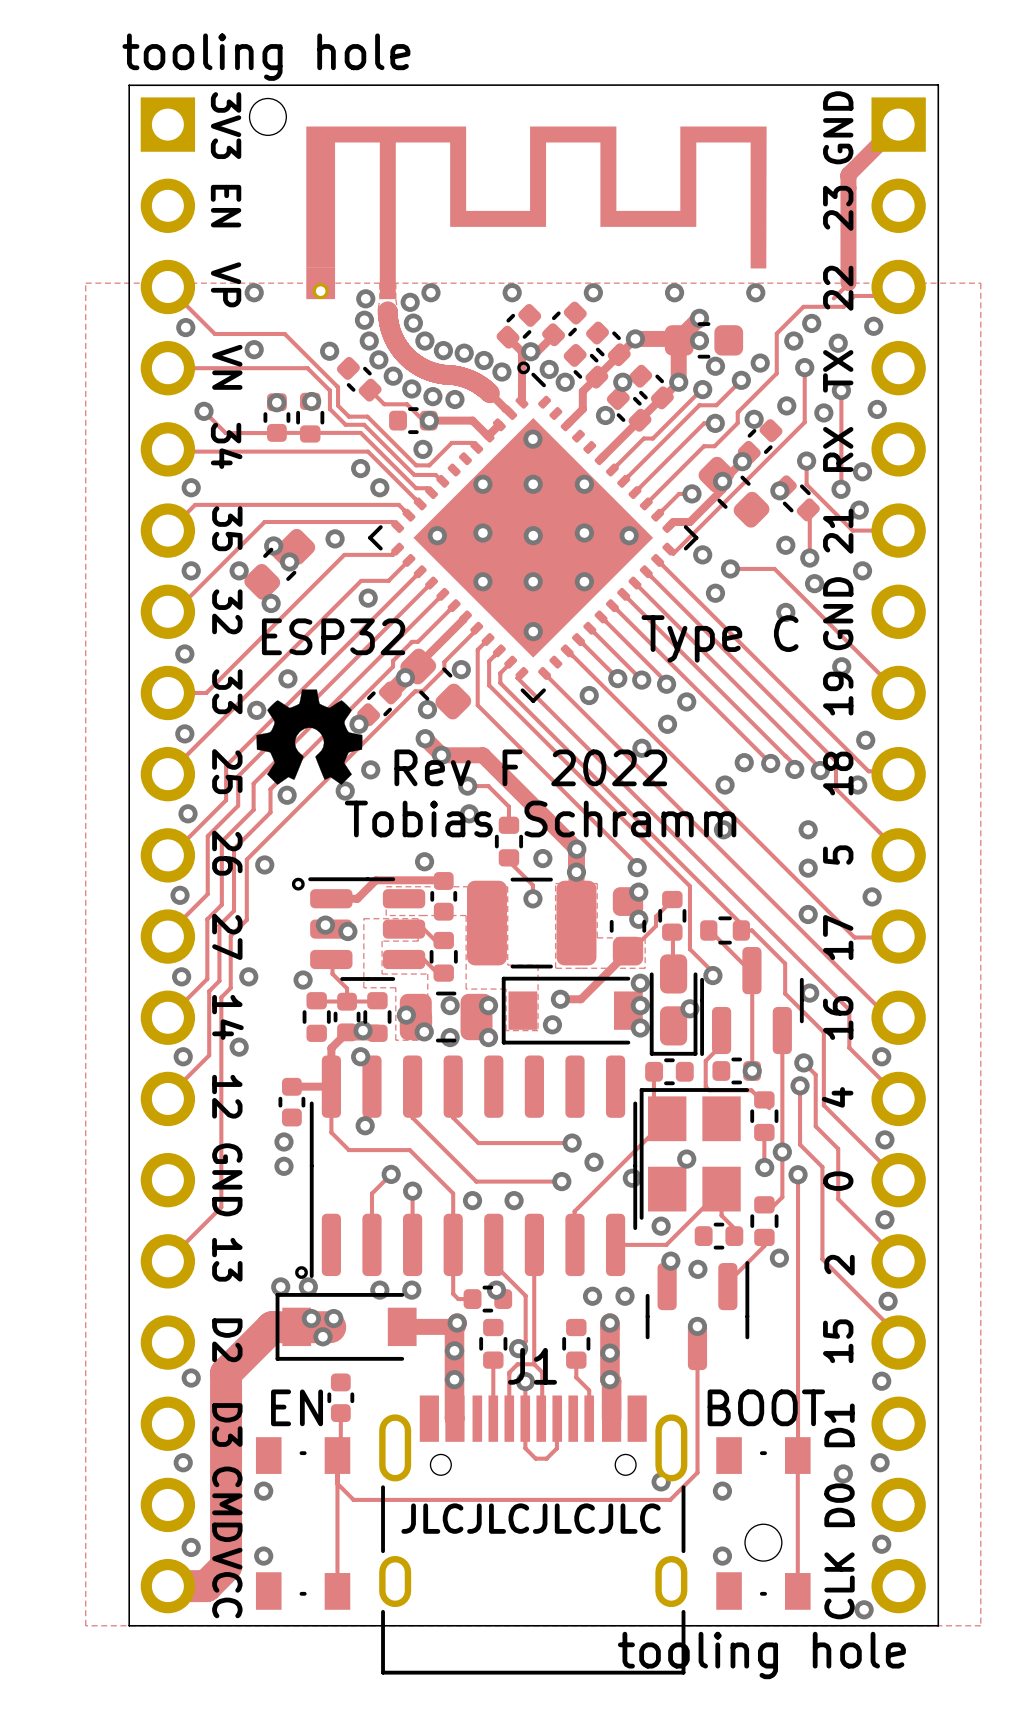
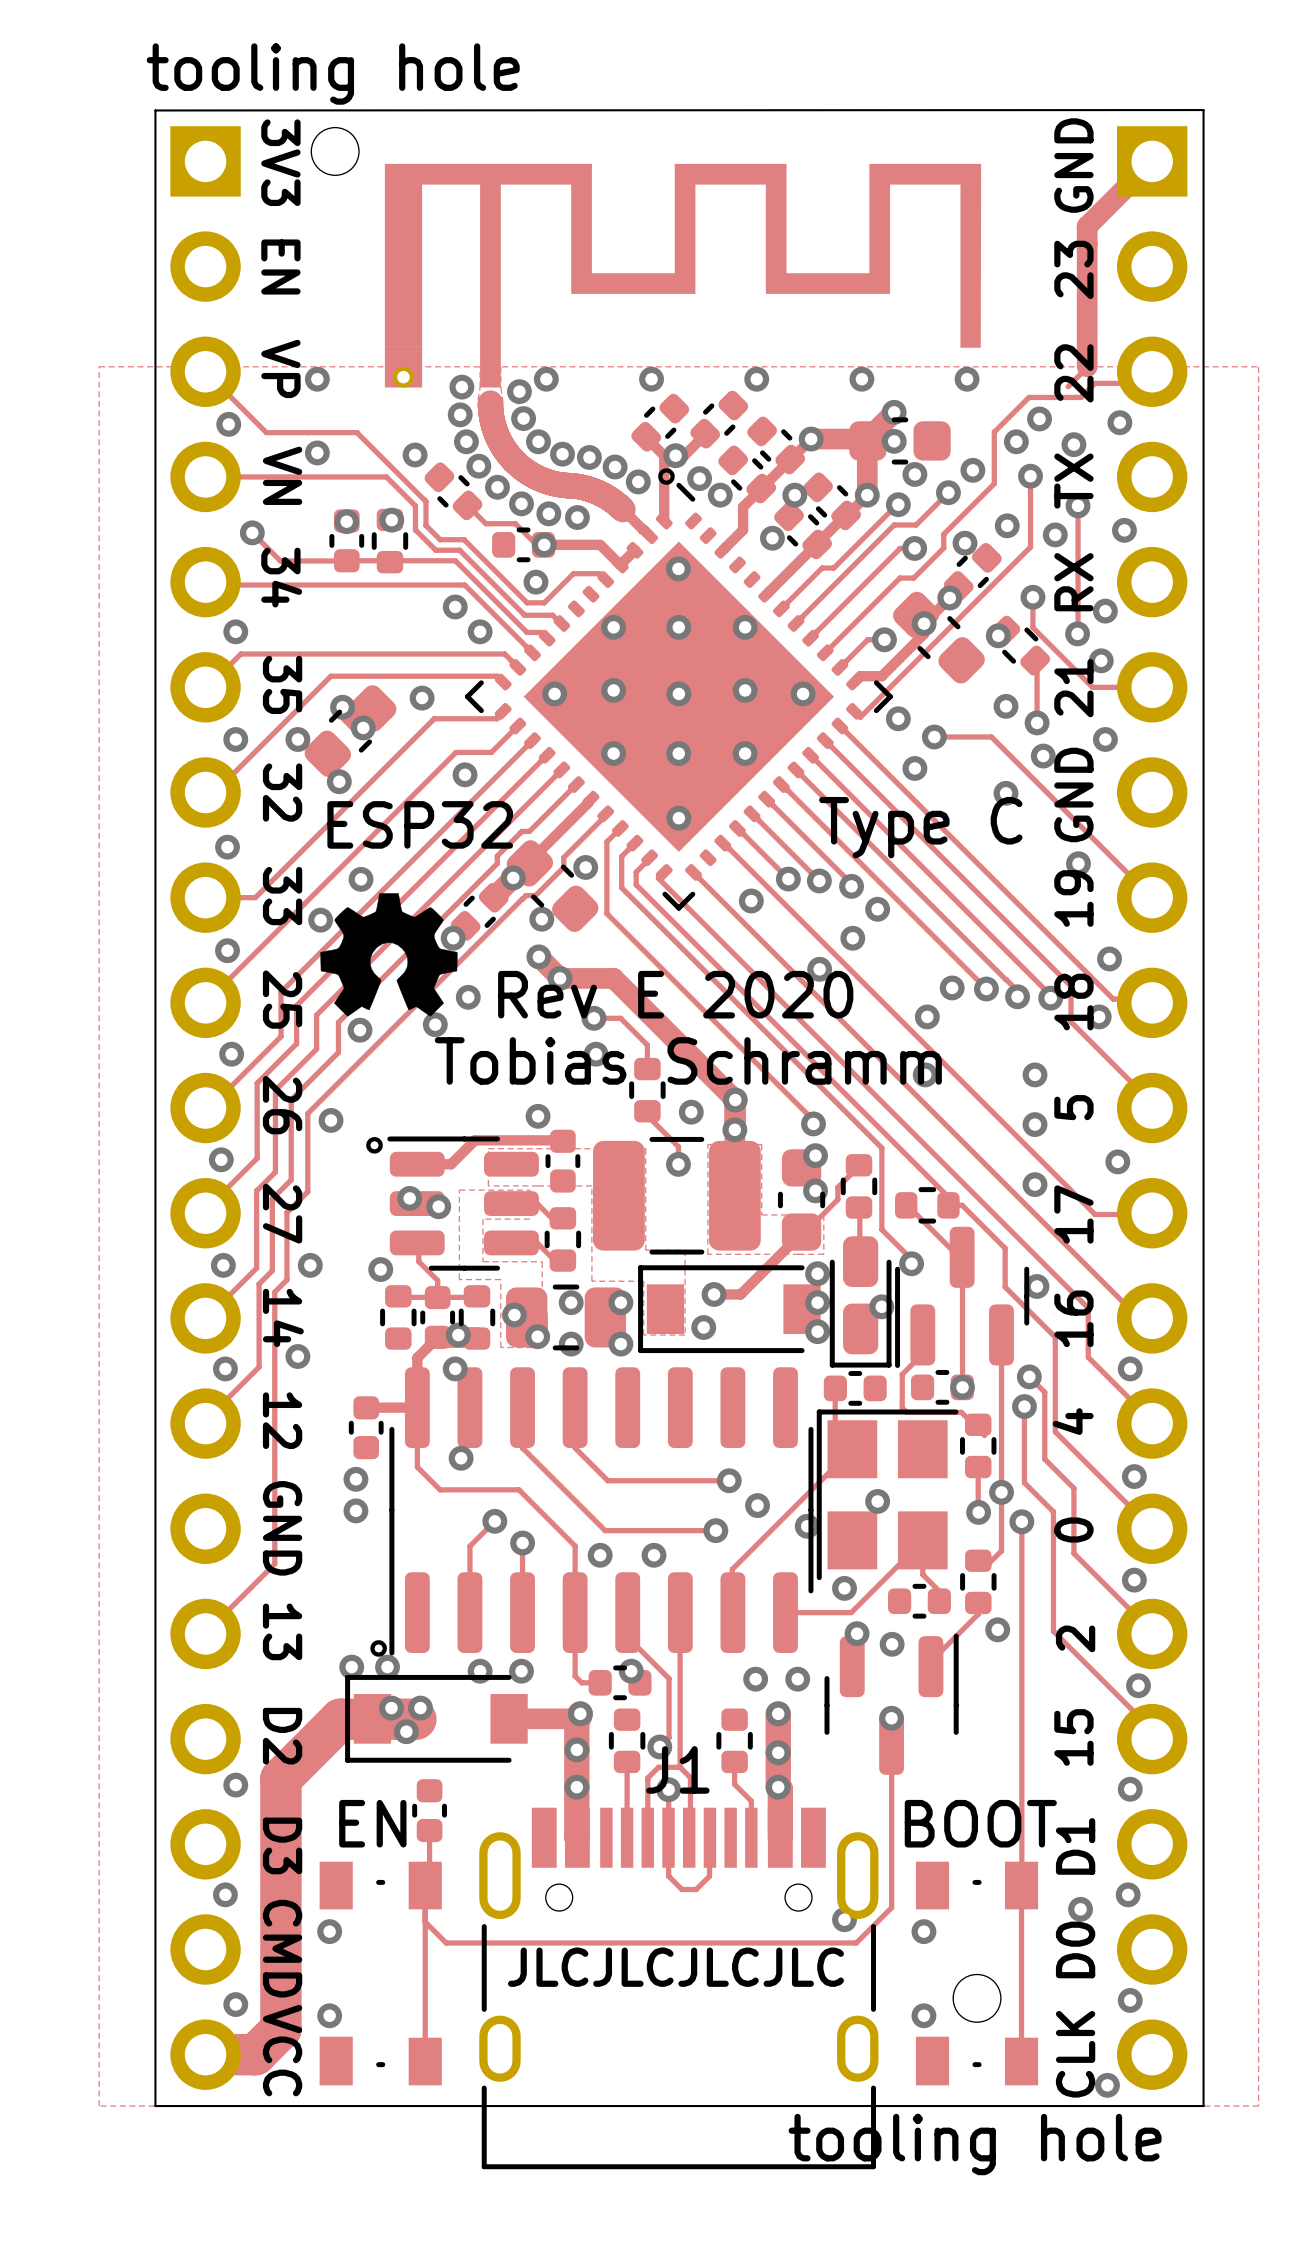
text: Rev F 2022 (530, 767) -> Rev E 2020 (675, 994)

